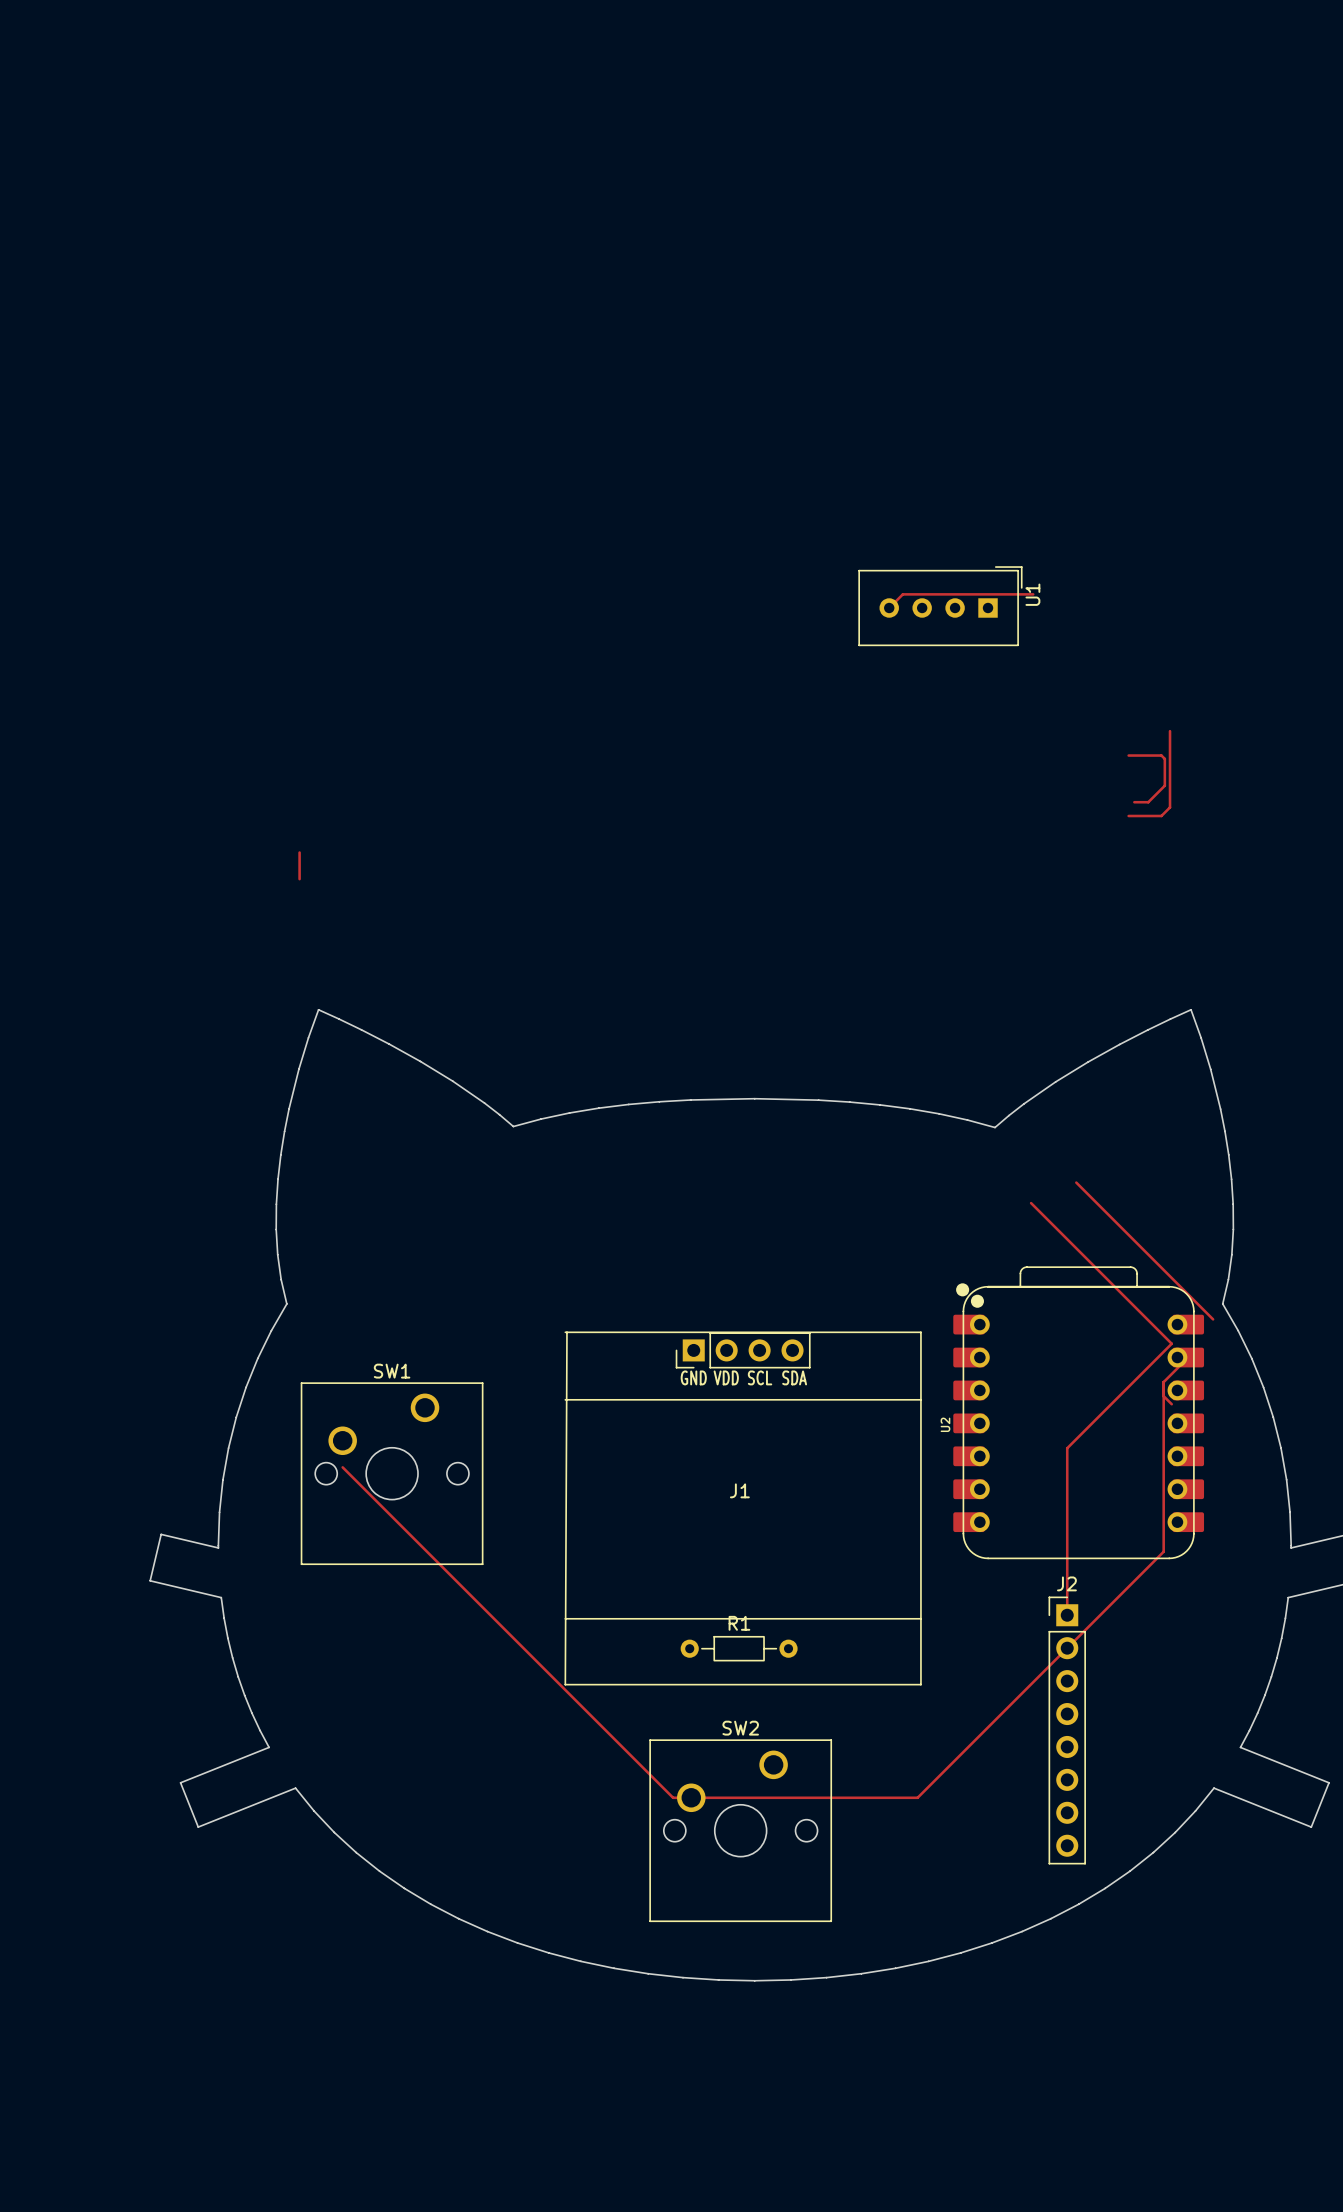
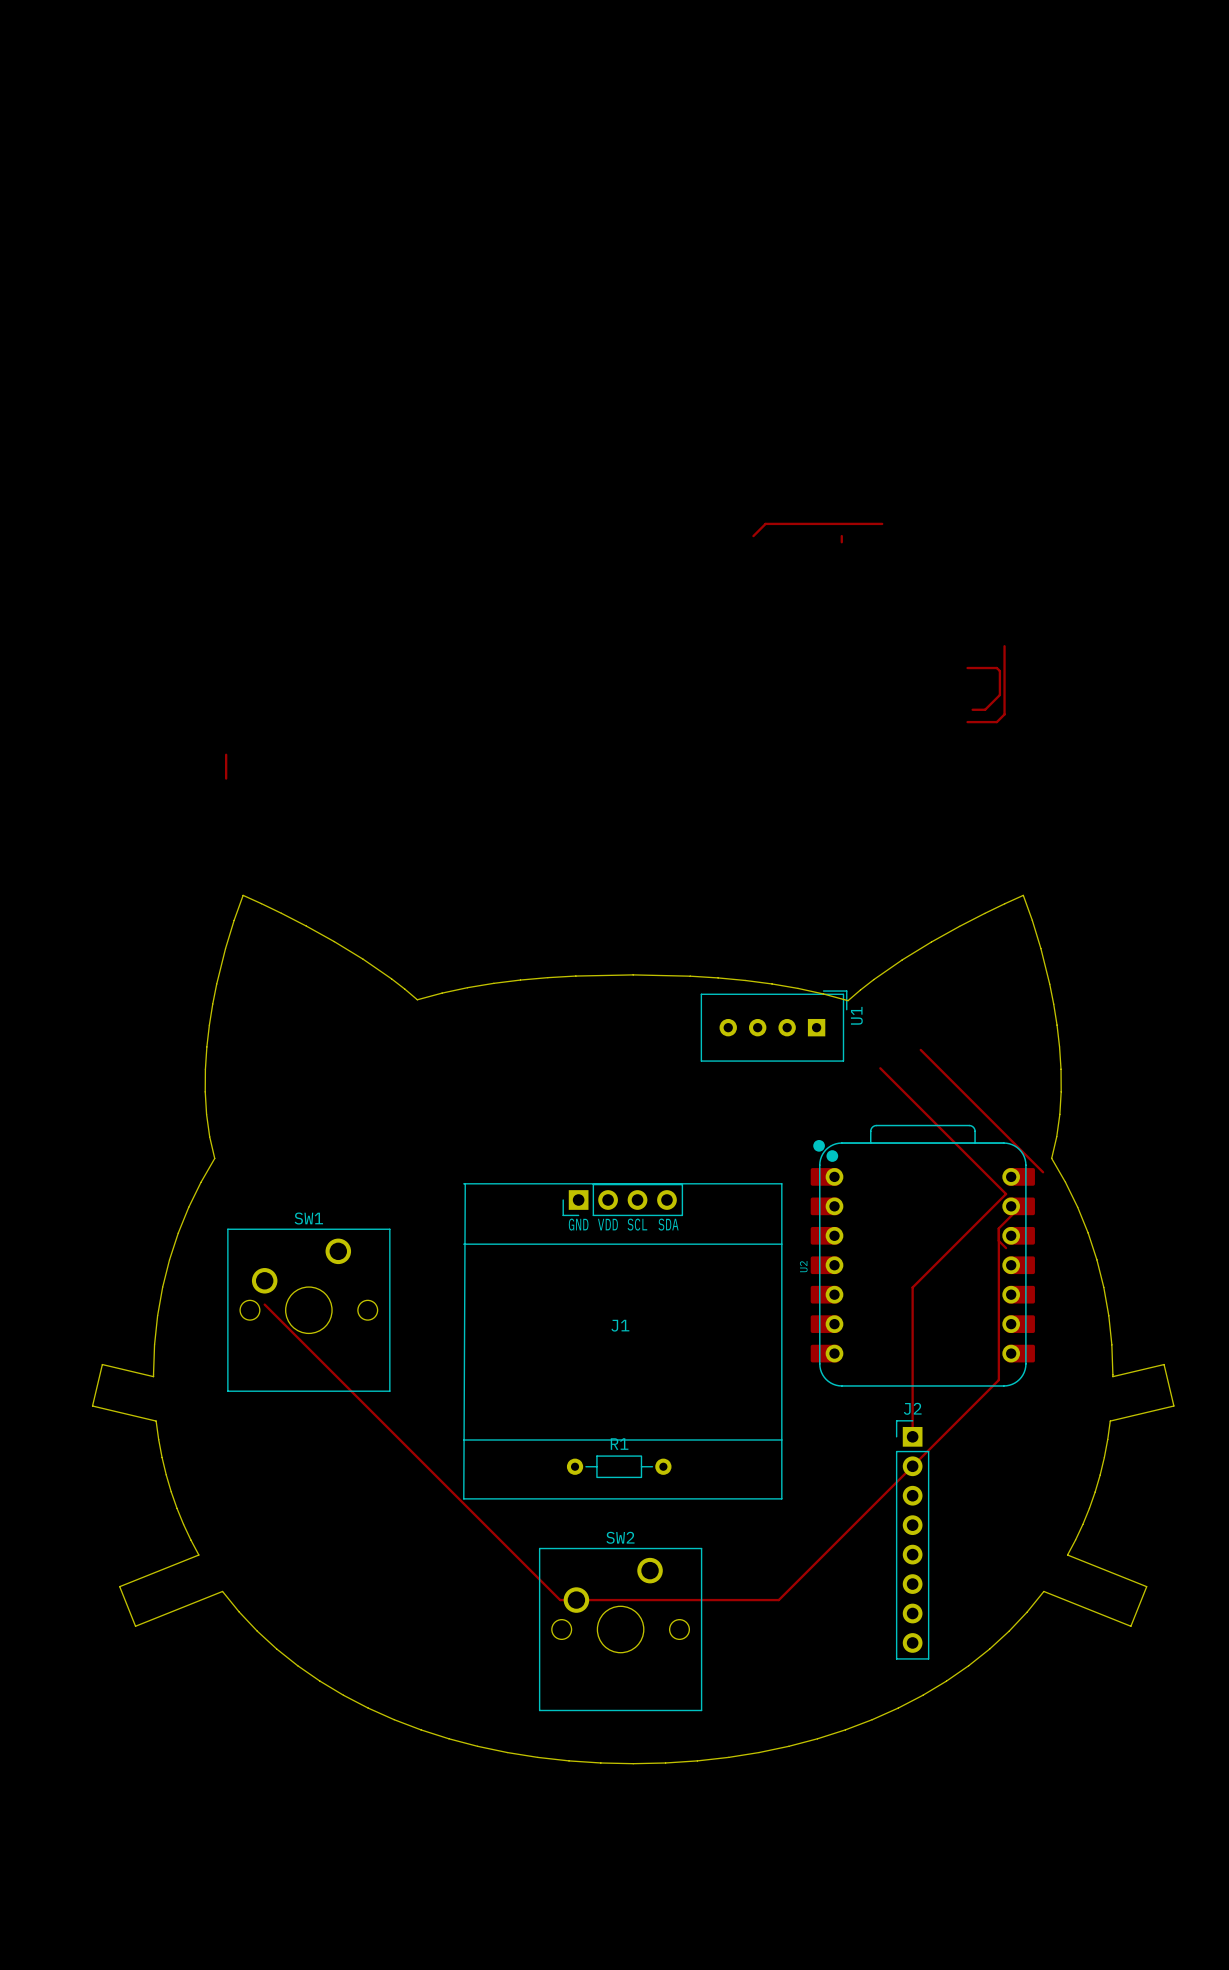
U1 position: (940, 606) -> (774, 1026)

